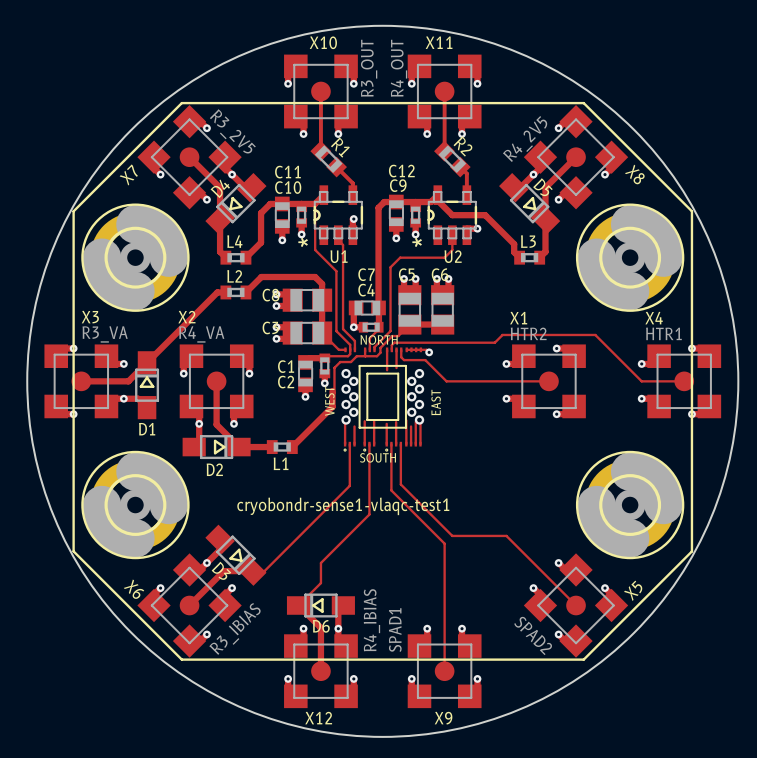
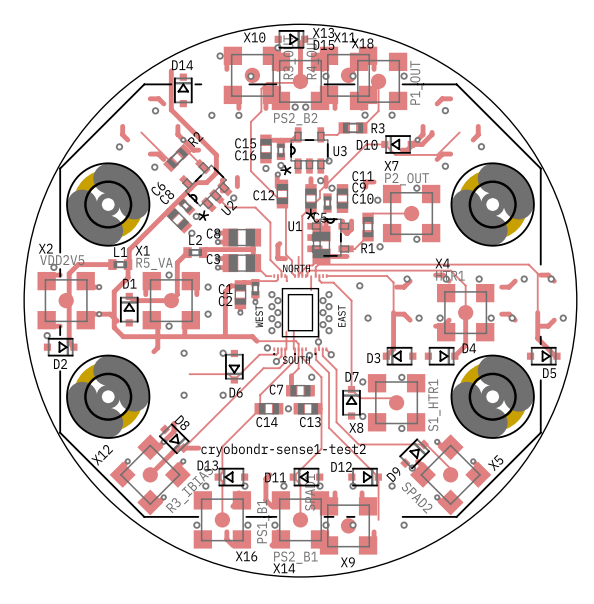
D15: none -> (291, 39)
track: none -> (304, 39) (300, 43) (300, 81) (267, 82) (261, 88) (261, 111) (250, 121) (250, 171) (285, 206) (285, 254) (291, 260) (291, 273) (294, 276)
via: none -> (277, 47)
via: none -> (220, 56)
via: (288, 83) -> none
via: (353, 83) -> none
via: (411, 83) -> none
via: (477, 83) -> none
track: none -> (171, 70) (171, 109) (216, 154) (216, 172) (206, 182) (196, 182) (129, 249) (128, 277) (114, 291) (114, 327) (123, 336) (252, 336) (256, 341) (295, 341) (298, 343) (298, 368) (291, 375) (291, 390)
track: (320, 91) (320, 151) -> none
track: (444, 91) (444, 151) -> none
via: none -> (250, 76)
via: none -> (325, 76)
via: none -> (353, 76)
via: none -> (404, 76)
X13: none -> PS2_B2 (300, 81)
track: none -> (378, 81) (378, 111) (361, 127)
X18: none -> P1_OUT (378, 81)
line: (216, 103) (247, 103) -> none
line: (255, 103) (317, 103) -> none
line: (351, 103) (413, 103) -> none
line: (452, 103) (514, 103) -> none
D14: none -> (183, 90)
via: (206, 128) -> none
via: (558, 128) -> none
X7 value: R3_2V5 (232, 131) -> P2_OUT (407, 179)
via: none -> (295, 107)
via: none -> (305, 107)
via: (303, 134) -> none
via: (338, 134) -> none
via: (427, 134) -> none
via: (462, 134) -> none
via: none -> (445, 110)
via: none -> (155, 110)
X8 value: R4_2V5 (525, 139) -> S1_HTR1 (434, 405)
via: none -> (211, 115)
via: none -> (238, 115)
via: none -> (365, 115)
via: none -> (392, 115)
track: (189, 157) (220, 187) (220, 251) (225, 257) -> none
X7 rotation: 0° (189, 157) -> 45° clockwise (411, 213)
X7 position: (189, 157) -> (411, 213)
track: (576, 157) (545, 187) (545, 251) (539, 257) -> none
X8 rotation: 0° (576, 157) -> 45° clockwise (396, 402)
X8 position: (576, 157) -> (396, 402)
R1 rotation: 0° (328, 159) -> 45° clockwise (368, 227)
R1 position: (328, 159) -> (368, 227)
track: none -> (344, 127) (337, 134) (320, 134)
R3: none -> (353, 127)
R2 rotation: 0° (452, 159) -> 90° clockwise (177, 157)
R2 position: (452, 159) -> (177, 157)
track: none -> (141, 132) (171, 164)
track: none -> (432, 132) (422, 144) (411, 144)
track: none -> (459, 132) (437, 154) (395, 154) (384, 144) (366, 144) (319, 191) (319, 198) (302, 215) (302, 276)
track: (336, 167) (352, 183) (352, 195) -> none
track: (460, 167) (466, 173) (466, 195) -> none
track: none -> (298, 134) (292, 140) (265, 140)
C12 name position: C12 (401, 171) -> C12 (263, 195)
D4 footprint: [205, 172, 267, 235] -> [424, 346, 459, 366]
C11 name position: C11 (287, 172) -> C11 (363, 176)
D5 footprint: [499, 172, 561, 235] -> [526, 346, 561, 366]
X7 name position: X7 (128, 174) -> X7 (391, 165)
via: (160, 174) -> none
via: (605, 174) -> none
X8 name position: X8 (634, 174) -> X8 (356, 427)
D10: none -> (398, 144)
via: none -> (119, 146)
via: none -> (481, 146)
C9 name position: C9 (398, 185) -> C9 (359, 187)
C16: none -> (265, 148)
C10 name position: C10 (288, 187) -> C10 (362, 198)
D5 name position: D5 (542, 187) -> D5 (549, 373)
D4 name position: D4 (220, 188) -> D4 (469, 348)
C15: none -> (280, 150)
U3: none -> (309, 150)
track: none -> (183, 151) (187, 151) (202, 166)
track: (323, 195) (315, 203) (270, 203) (261, 213) (261, 242) (245, 257) -> none
via: (206, 199) -> none
via: (558, 199) -> none
via: none -> (329, 160)
C10 footprint: [296, 202, 308, 228] -> [305, 184, 317, 213]
track: (315, 204) (315, 249) (336, 271) (336, 331) (350, 344) (350, 354) (348, 356) -> (277, 276) (277, 279) (273, 281)
via: none -> (280, 165)
via: none -> (445, 166)
via: none -> (154, 167)
via: none -> (265, 168)
C12 position: (396, 213) -> (282, 194)
C11 position: (282, 215) -> (342, 198)
U1 rotation: 0° (338, 215) -> 90° clockwise (330, 237)
U1 position: (338, 215) -> (330, 237)
C9 position: (415, 215) -> (327, 203)
U2 rotation: 0° (452, 215) -> 45° counterclockwise (205, 185)
U2 position: (452, 215) -> (205, 185)
via: none -> (320, 180)
via: (477, 228) -> none
via: (301, 234) -> none
via: (415, 234) -> none
track: (338, 235) (338, 240) (343, 245) (343, 329) (354, 341) (354, 349) -> none
track: (452, 235) (452, 249) (444, 257) (400, 257) (390, 267) (390, 331) (374, 347) (374, 349) -> none
via: none -> (331, 188)
via: none -> (416, 188)
via: (396, 238) -> none
via: (282, 240) -> none
track: none -> (216, 196) (227, 207) (255, 207) (270, 222) (270, 260) (281, 271) (281, 276)
via: none -> (233, 198)
via: none -> (377, 200)
L4: (235, 257) -> none
track: (519, 257) (514, 252) (514, 244) (485, 215) (452, 215) (437, 200) (437, 195) (430, 202) (384, 202) (378, 207) (378, 329) (369, 338) (369, 349) -> none
L3: (529, 257) -> none
C8: none -> (185, 205)
track: none -> (411, 213) (372, 213) (368, 218)
via: none -> (196, 216)
C7 name position: C7 (366, 274) -> C7 (276, 389)
via: (404, 278) -> none
via: (415, 278) -> none
via: (436, 278) -> none
via: (448, 278) -> none
C6 footprint: [431, 285, 455, 335] -> [163, 205, 193, 234]
track: (225, 292) (217, 292) (128, 381) (81, 381) -> none
L2 position: (235, 292) -> (195, 252)
track: (245, 292) (261, 277) (315, 277) (322, 283) (322, 296) -> none
via: none -> (191, 233)
track: none -> (368, 235) (354, 248) (346, 248)
via: none -> (416, 239)
C7 position: (367, 307) -> (300, 390)
via: none -> (380, 246)
track: none -> (253, 249) (206, 249) (203, 252)
X3 name: X3 (90, 317) -> X2 (45, 248)
X2 name: X2 (186, 317) -> X1 (142, 250)
line: (73, 319) (73, 340) -> none
track: none -> (187, 252) (177, 262) (177, 294) (174, 300) (133, 300) (129, 296)
via: (353, 327) -> none
C4: (371, 327) -> none
X3 value: R3_VA (105, 334) -> VDD2V5 (62, 260)
track: none -> (112, 264) (78, 264) (69, 273) (69, 342) (73, 347)
X2 value: R4_VA (201, 334) -> R5_VA (154, 263)
track: (502, 334) (494, 342) -> (393, 264) (318, 264) (315, 267) (315, 276)
track: (595, 334) (641, 381) (684, 381) -> (465, 264) (528, 264) (537, 273) (537, 338) (556, 356)
line: (691, 334) (691, 427) -> none
via: none -> (53, 267)
track: none -> (387, 270) (450, 270) (465, 285) (465, 345) (454, 356)
part footprint: [343, 347, 423, 452] -> [273, 274, 328, 355]
via: (73, 348) -> none
via: none -> (169, 275)
via: (556, 348) -> none
via: (691, 348) -> none
track: (380, 349) (376, 356) (356, 356) (350, 362) (340, 362) (334, 367) (332, 406) (292, 447) -> none
track: (387, 349) (387, 370) -> none
track: (401, 349) (401, 357) (404, 360) (425, 360) (446, 381) (548, 381) -> none
track: (406, 349) (426, 349) (429, 352) -> (319, 276) (321, 282) (333, 282) (351, 300) (351, 389) (360, 398) (392, 398) (396, 402)
track: none -> (326, 276) (386, 276) (393, 282) (393, 349) (386, 356)
line: (73, 350) (73, 414) -> none
D1 footprint: [135, 351, 160, 420] -> [119, 292, 139, 327]
via: (429, 352) -> none
via: none -> (407, 279)
via: none -> (446, 279)
via: none -> (479, 279)
via: none -> (524, 279)
via: none -> (551, 279)
track: none -> (240, 285) (231, 285) (225, 291) (225, 336)
via: none -> (359, 285)
via: none -> (208, 287)
via: (506, 363) -> none
via: (641, 363) -> none
via: (183, 373) -> none
via: (249, 373) -> none
track: (216, 381) (216, 424) (239, 447) (272, 447) -> none
X1: HTR2 (548, 381) -> none
X4 position: (684, 381) -> (465, 312)
via: none -> (208, 314)
via: (506, 398) -> none
via: (641, 398) -> none
via: none -> (368, 318)
via: none -> (419, 318)
via: none -> (440, 318)
via: none -> (491, 318)
via: none -> (512, 318)
via: none -> (563, 318)
via: (73, 414) -> none
via: none -> (169, 326)
via: (556, 414) -> none
via: (691, 414) -> none
track: (415, 421) (415, 444) -> (331, 354) (326, 349)
track: (345, 422) (345, 444) -> none
track: (396, 422) (396, 444) -> none
track: (420, 422) (420, 444) -> none
via: (199, 423) -> none
via: (234, 423) -> none
track: (386, 423) (386, 444) -> none
line: (73, 425) (73, 472) -> none
via: none -> (47, 335)
track: (354, 426) (354, 444) -> none
track: (411, 426) (411, 444) -> (455, 473) (426, 444) (358, 444) (336, 422) (336, 369) (322, 355) (322, 349)
D1 name position: D1 (147, 429) -> D1 (129, 283)
via: none -> (318, 341)
D2 footprint: [182, 435, 251, 460] -> [43, 337, 78, 357]
line: (691, 437) (691, 483) -> none
via: none -> (267, 347)
track: none -> (277, 349) (276, 354) (259, 354) (234, 379) (228, 374) (189, 374)
track: none -> (281, 349) (281, 356) (276, 361)
track: none -> (285, 349) (285, 362) (279, 368) (263, 368) (183, 448)
track: none -> (294, 349) (294, 360) (260, 394) (260, 408) (222, 446) (222, 472) (218, 477) (222, 481) (222, 519)
track: none -> (302, 349) (302, 358) (321, 377) (321, 448) (293, 477) (300, 484) (300, 519)
track: none -> (315, 349) (316, 359) (329, 372) (329, 427) (378, 477) (378, 519)
track: (349, 444) (349, 485) (264, 571) (251, 571) -> none
track: (369, 444) (369, 514) (320, 562) (320, 583) (298, 605) (320, 627) (320, 671) -> none
track: (391, 444) (391, 490) (444, 543) (444, 671) -> none
track: (400, 444) (400, 484) (452, 535) (506, 535) (576, 605) -> none
L1 position: (282, 447) -> (120, 264)
via: none -> (184, 353)
via: none -> (223, 353)
via: none -> (331, 354)
via: none -> (309, 355)
via: none -> (276, 361)
L1 name position: L1 (281, 463) -> L1 (120, 252)
via: none -> (311, 377)
via: none -> (401, 377)
via: none -> (362, 381)
via: none -> (184, 395)
via: none -> (223, 395)
text: cryobondr-sense1-vlaqc-test1 (343, 506) -> none
D7: none -> (351, 402)
C14: none -> (268, 408)
via: none -> (288, 408)
C13: none -> (307, 408)
D3 footprint: [205, 524, 267, 586] -> [382, 346, 417, 366]
via: none -> (362, 416)
via: none -> (401, 428)
D8: none -> (174, 438)
text: none -> cryobondr-sense1-test2 (283, 450)
D9: none -> (414, 453)
via: (533, 588) -> none
X6 name: X6 (134, 589) -> X12 (102, 455)
D6 footprint: [286, 593, 355, 618] -> [225, 349, 244, 384]
via: none -> (412, 468)
D13: none -> (231, 477)
D11: none -> (306, 477)
D12: none -> (365, 477)
via: none -> (205, 486)
via: none -> (244, 486)
via: none -> (283, 486)
via: none -> (319, 486)
via: none -> (353, 486)
via: none -> (392, 486)
via: (303, 628) -> none
via: (338, 628) -> none
via: (427, 628) -> none
via: (462, 628) -> none
line: (251, 659) (313, 659) -> none
line: (351, 659) (413, 659) -> none
line: (425, 659) (442, 659) -> none
line: (452, 659) (514, 659) -> none
X16: none -> PS1_B1 (222, 519)
X14: none -> PS2_B1 (300, 519)
via: none -> (196, 525)
via: none -> (247, 525)
via: none -> (274, 525)
via: none -> (325, 525)
via: none -> (353, 525)
via: none -> (404, 525)
X12: R4_IBIAS (320, 671) -> none
via: (288, 678) -> none
via: (353, 678) -> none
via: (411, 678) -> none
via: (477, 678) -> none

